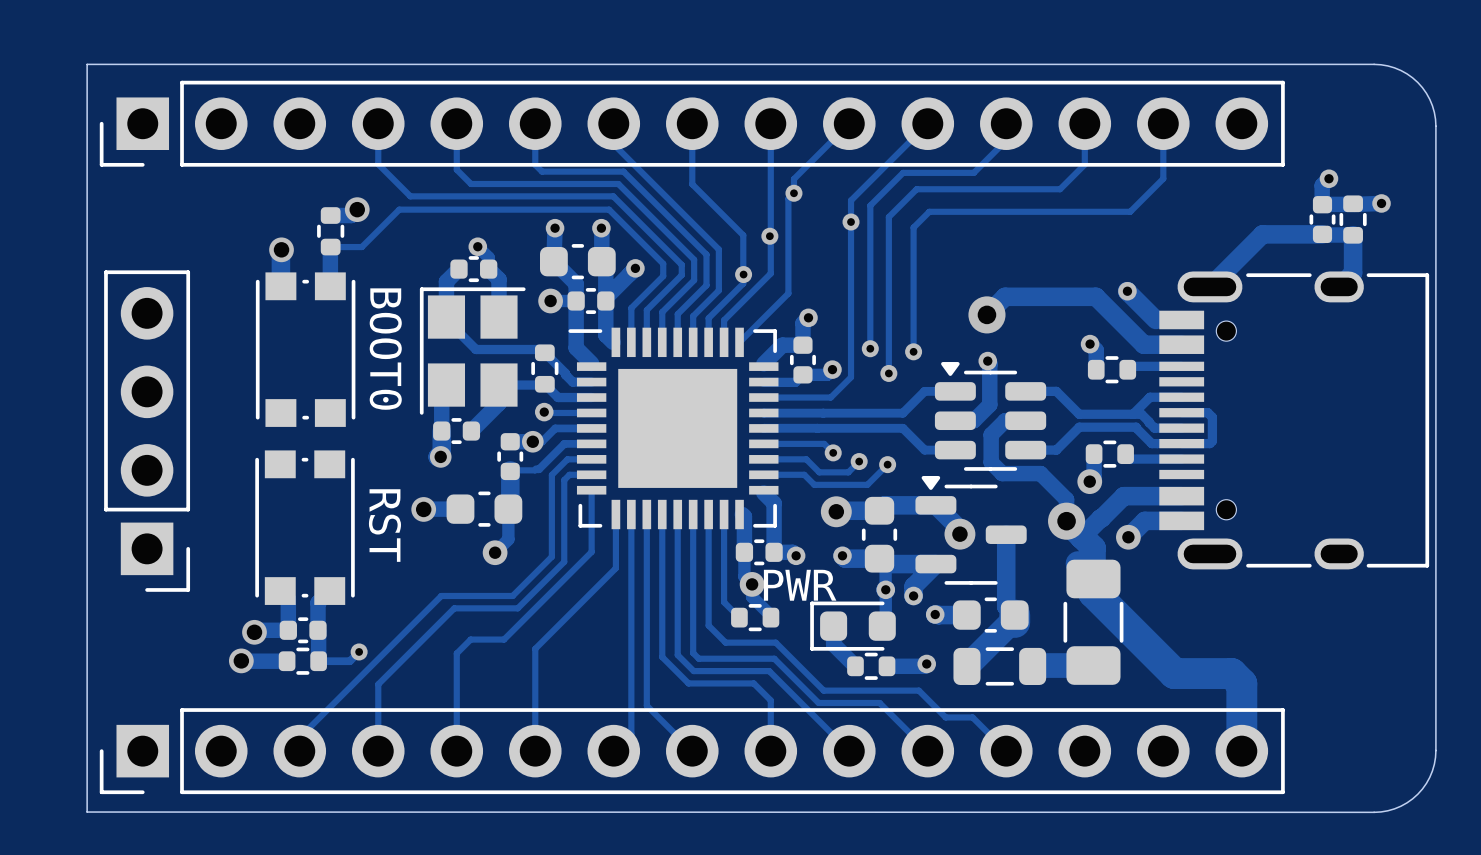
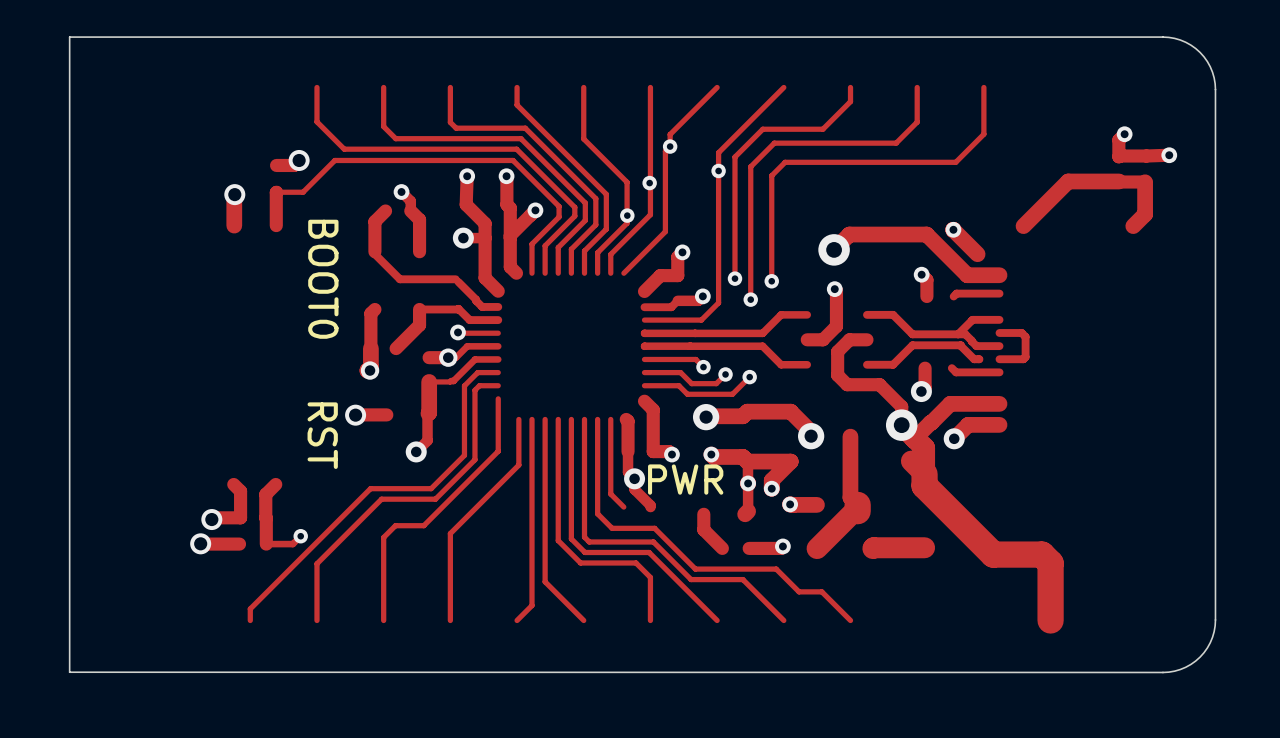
part: (692, 123) -> none
part: (1322, 219) -> none
part: (1353, 219) -> none
part: (330, 231) -> none
part: (577, 261) -> none
part: (473, 269) -> none
part: (590, 301) -> none
part: (305, 349) -> none
part: (472, 351) -> none
part: (802, 360) -> none
part: (544, 368) -> none
part: (1112, 369) -> none
part: (990, 416) -> none
part: (1294, 420) -> none
part: (673, 428) -> none
part: (147, 431) -> none
part: (456, 431) -> none
part: (1109, 454) -> none
part: (510, 456) -> none
part: (484, 509) -> none
part: (305, 527) -> none
part: (971, 530) -> none
part: (879, 534) -> none
part: (759, 552) -> none
part: (990, 615) -> none
part: (755, 617) -> none
part: (1093, 622) -> none
part: (853, 626) -> none
part: (303, 630) -> none
part: (302, 661) -> none
part: (871, 666) -> none
part: (999, 666) -> none
part: (692, 751) -> none

